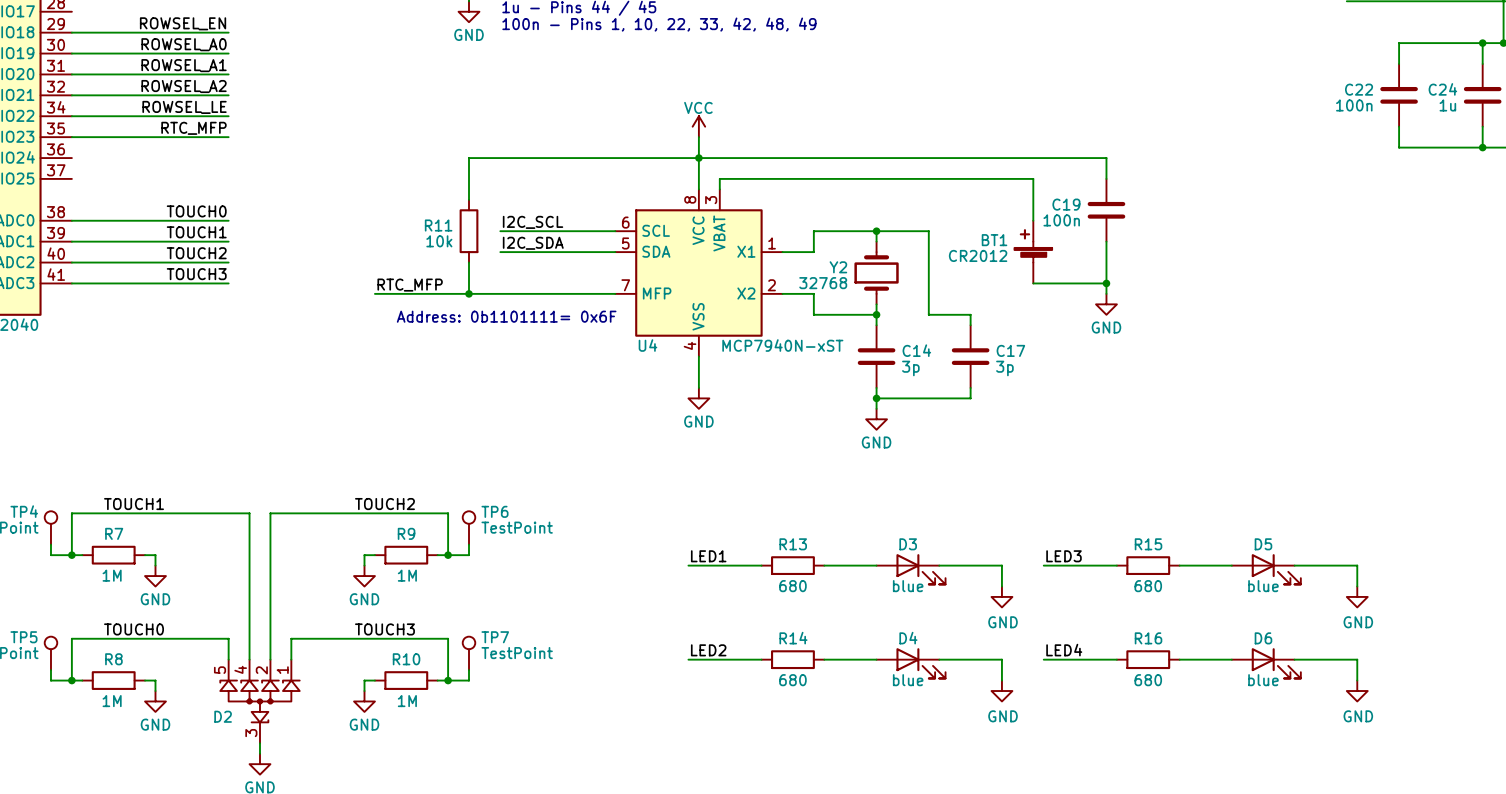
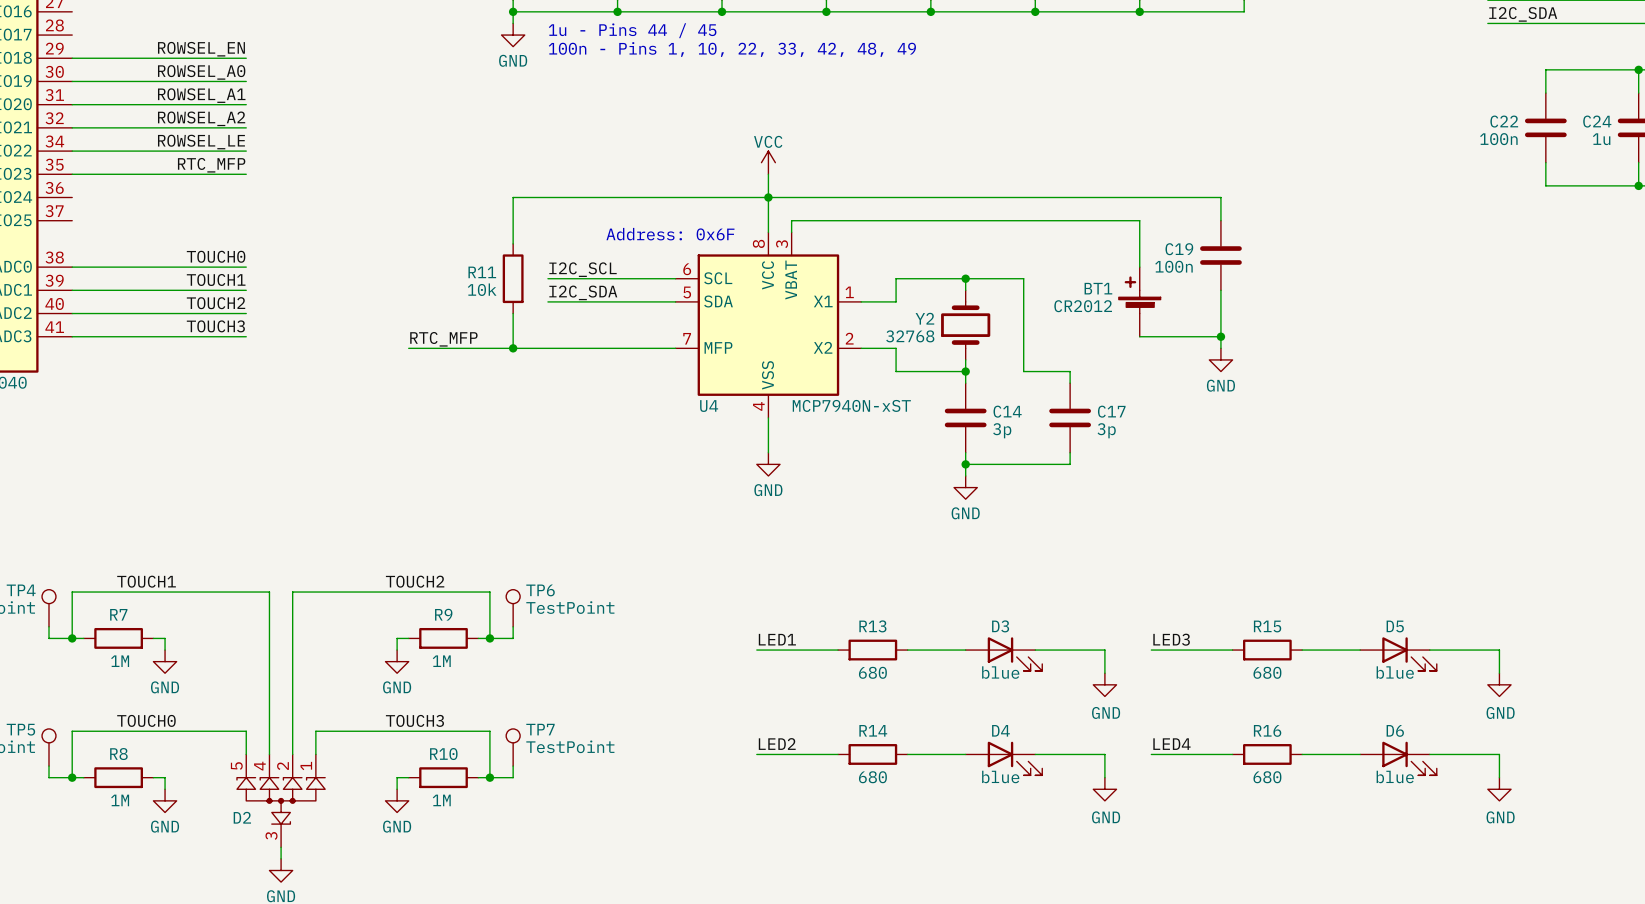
text: none -> Address: 0x6F (670, 234)
text: Address: 0b1101111= 0x6F (506, 316) -> none

